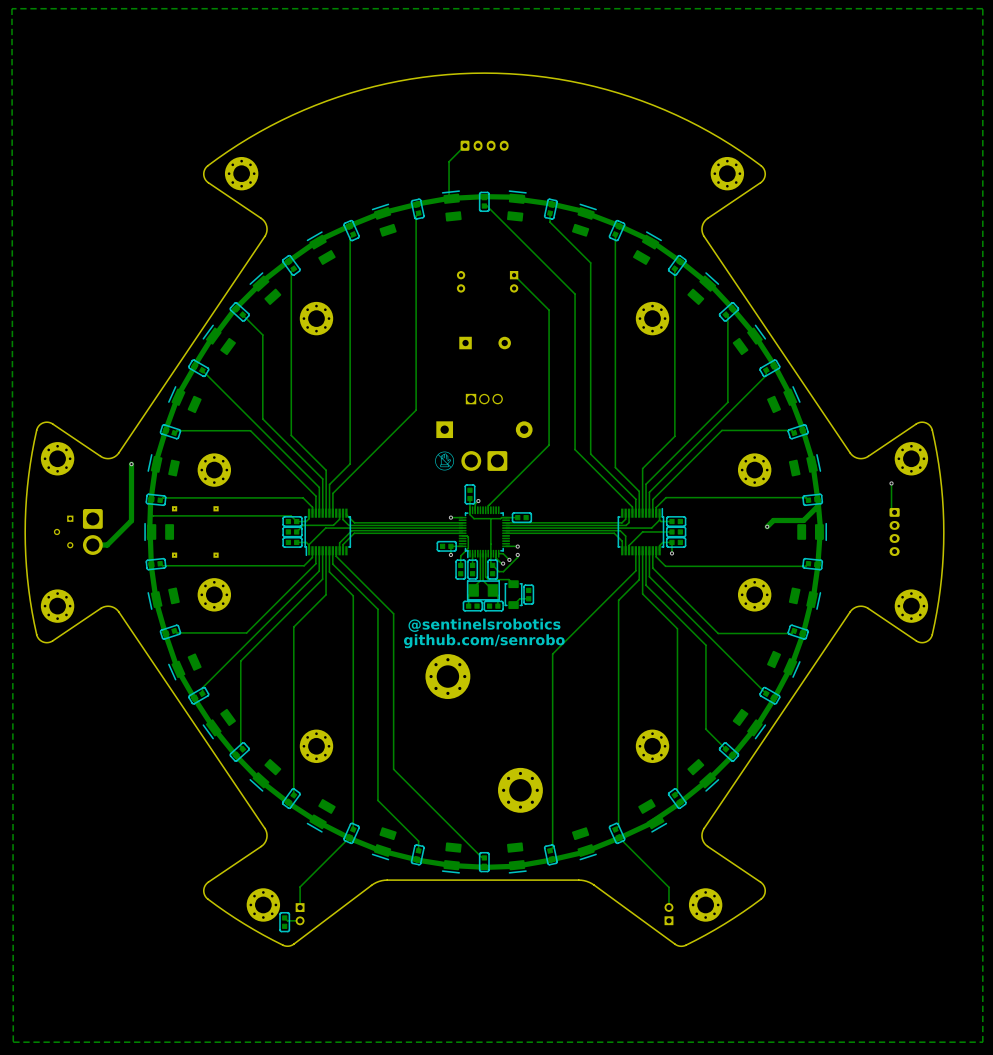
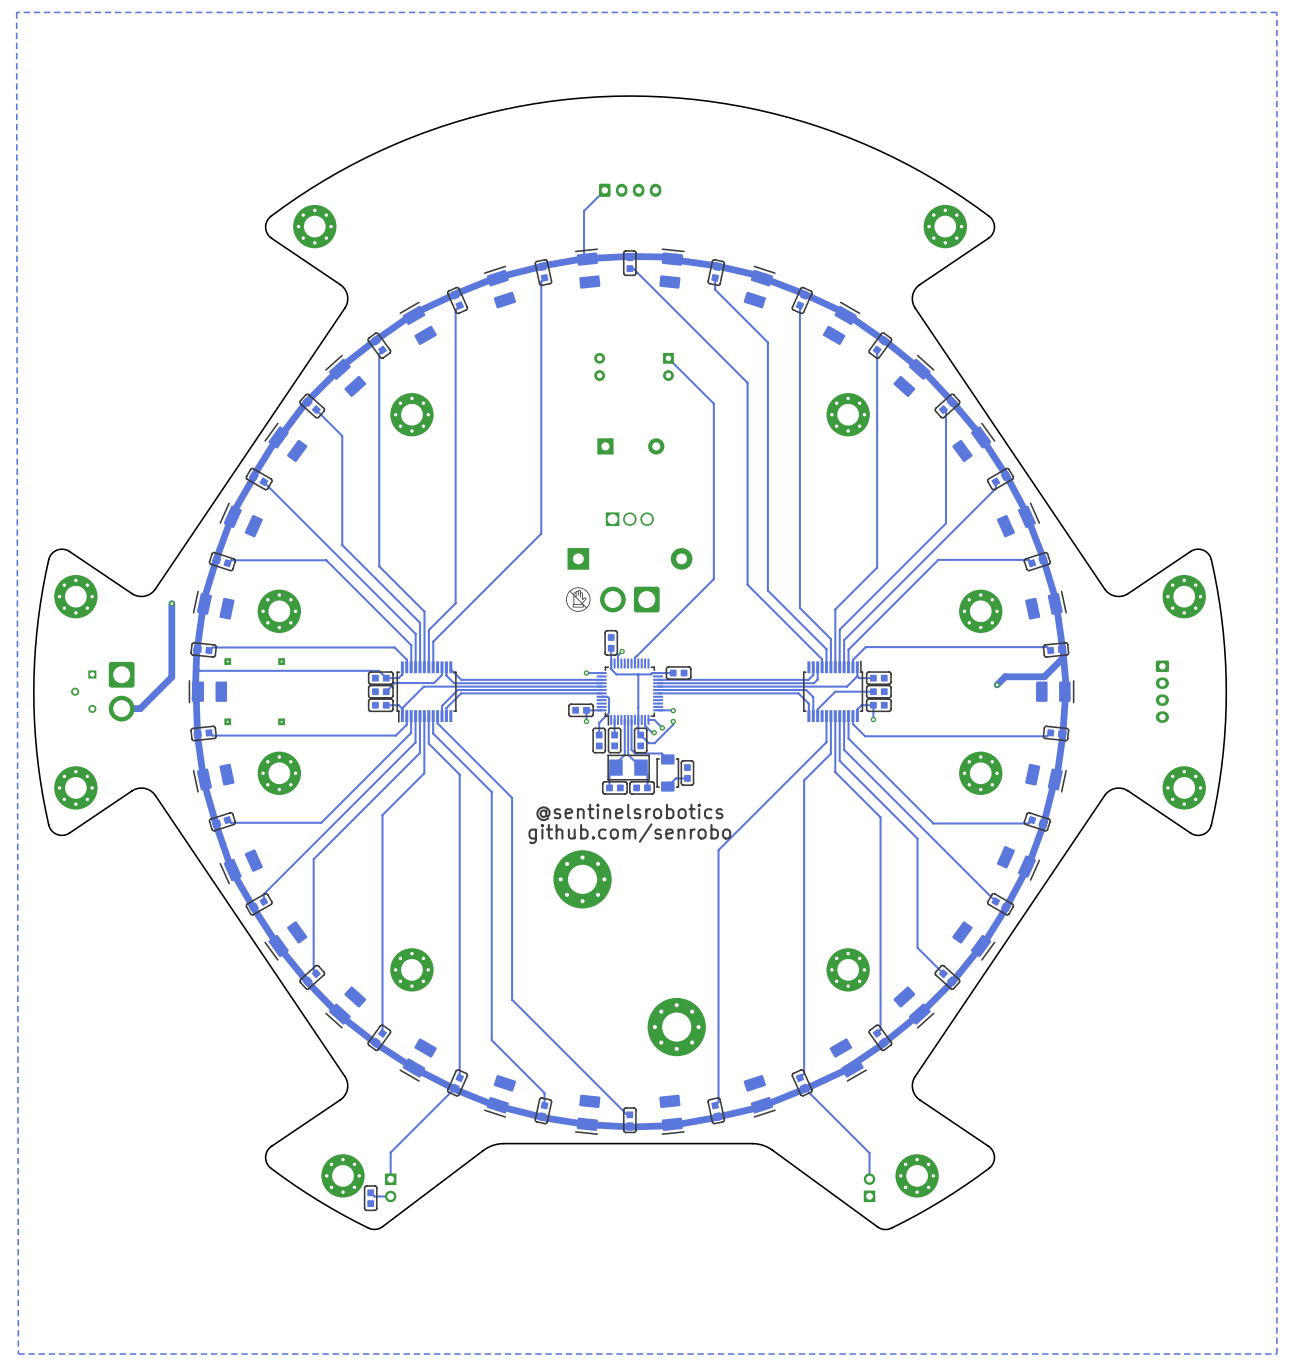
track: (891, 483) (891, 509) (894, 512) -> none
via: (891, 483) -> none

